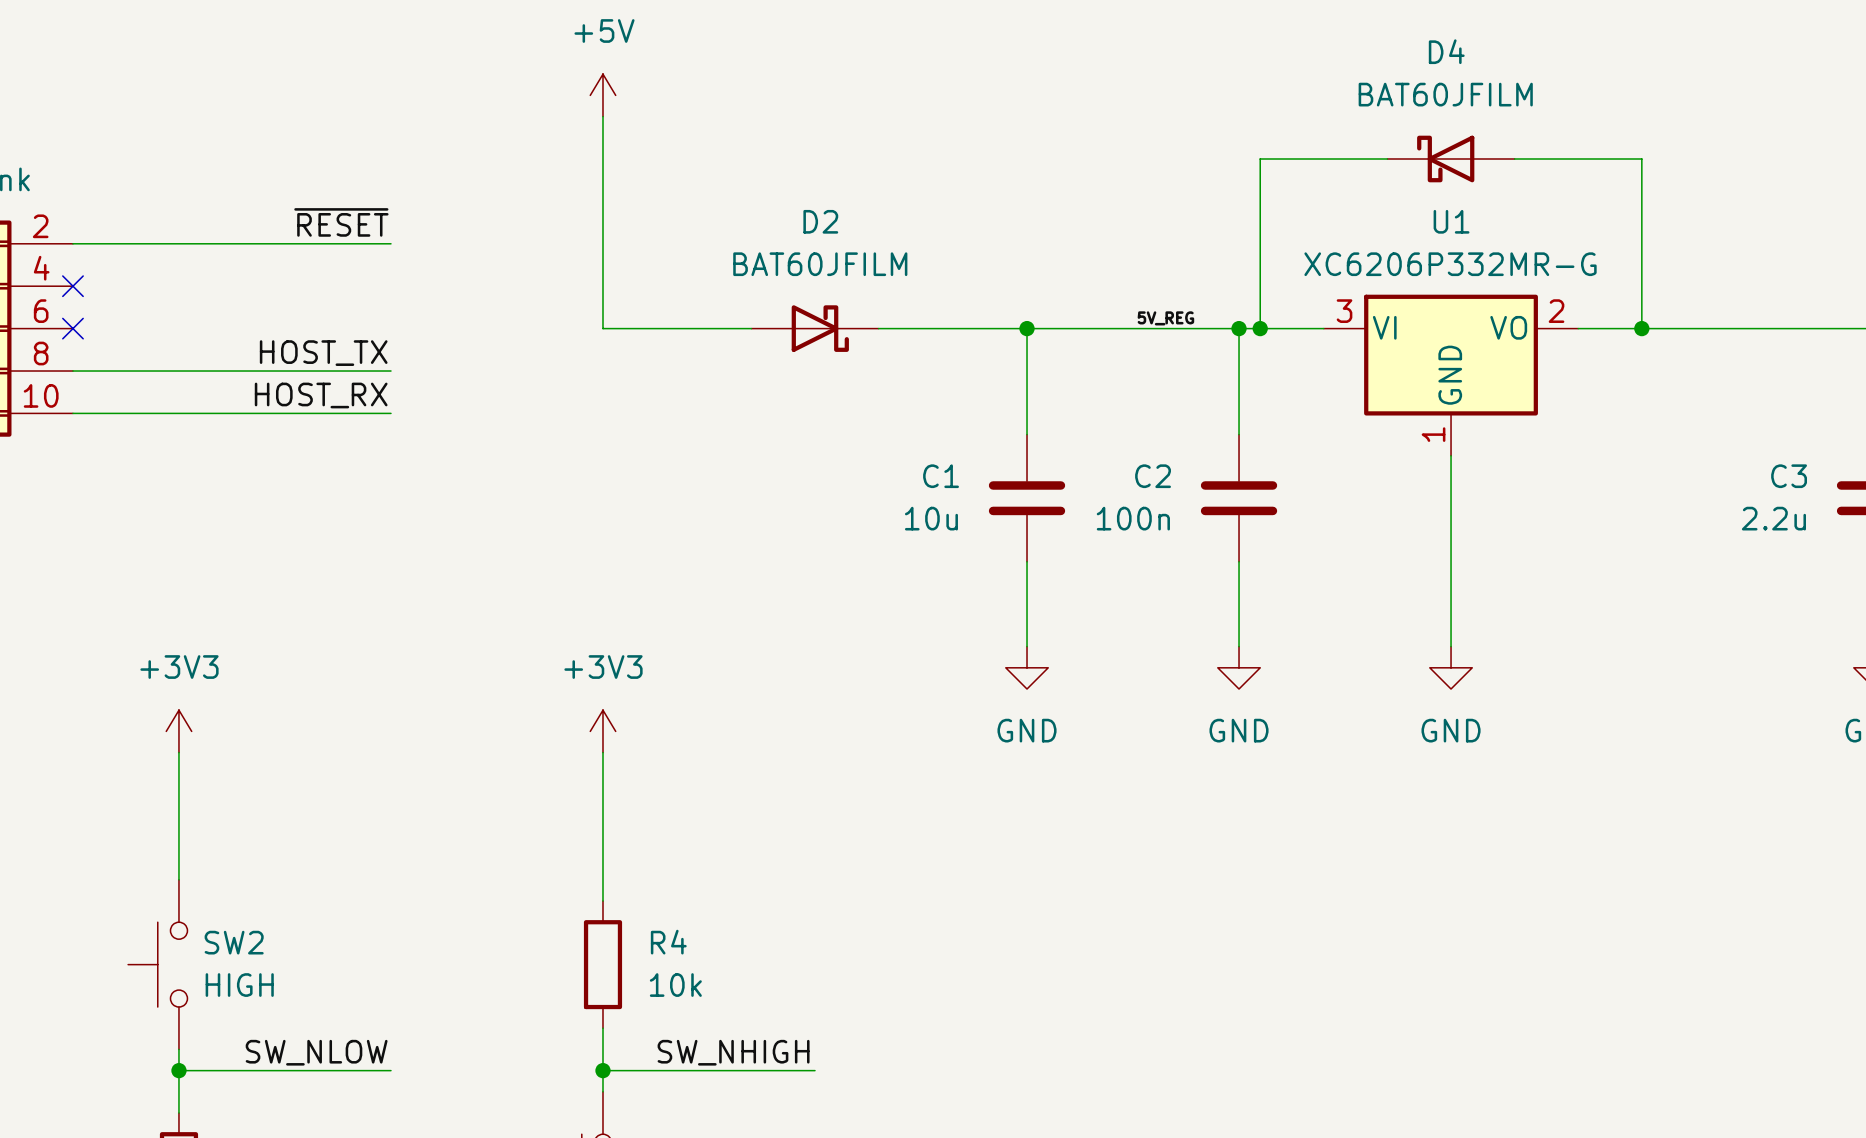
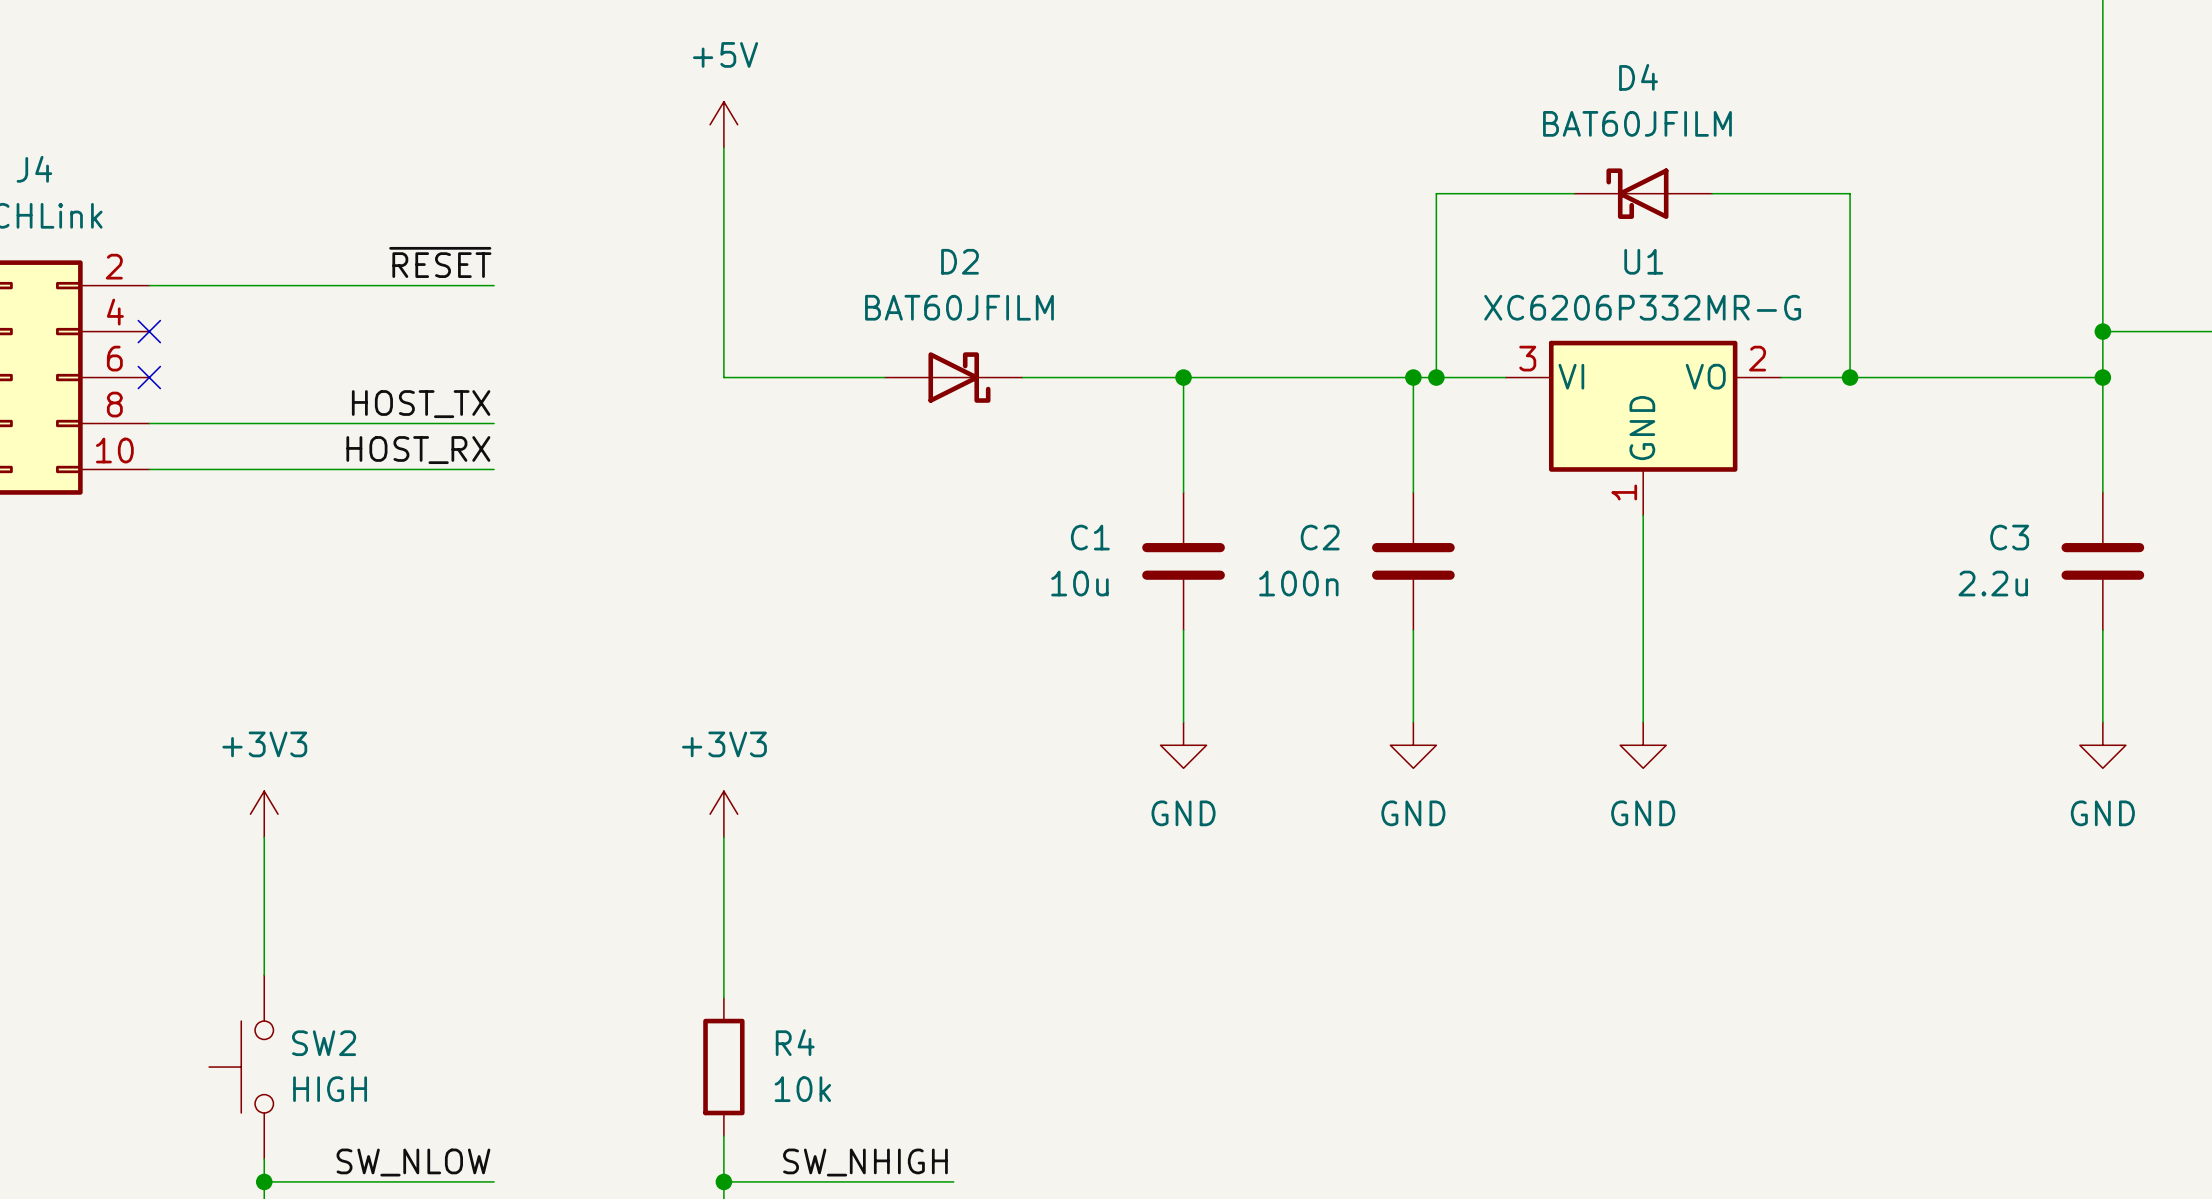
label: 5V_REG (1165, 318) -> none

